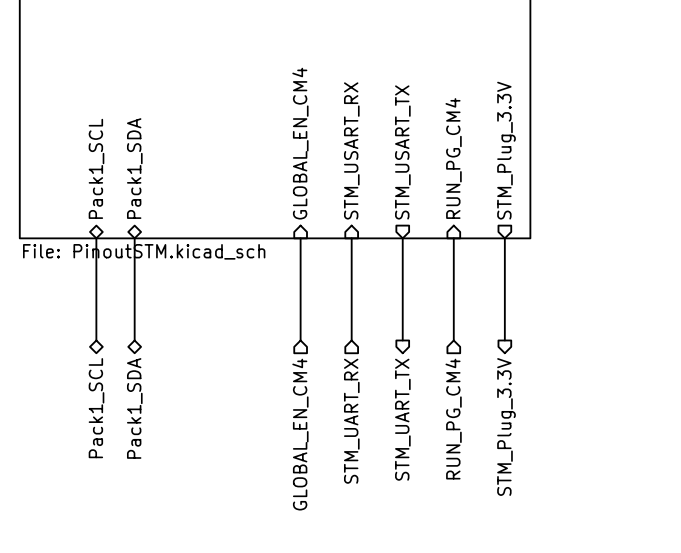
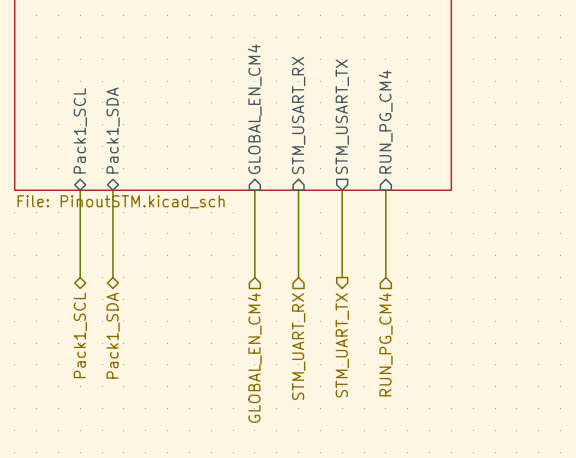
sheet pin: STM_Plug_3.3V (506, 150) -> none
wire: (504, 238) (504, 340) -> none
hierarchical label: STM_Plug_3.3V (506, 426) -> none

